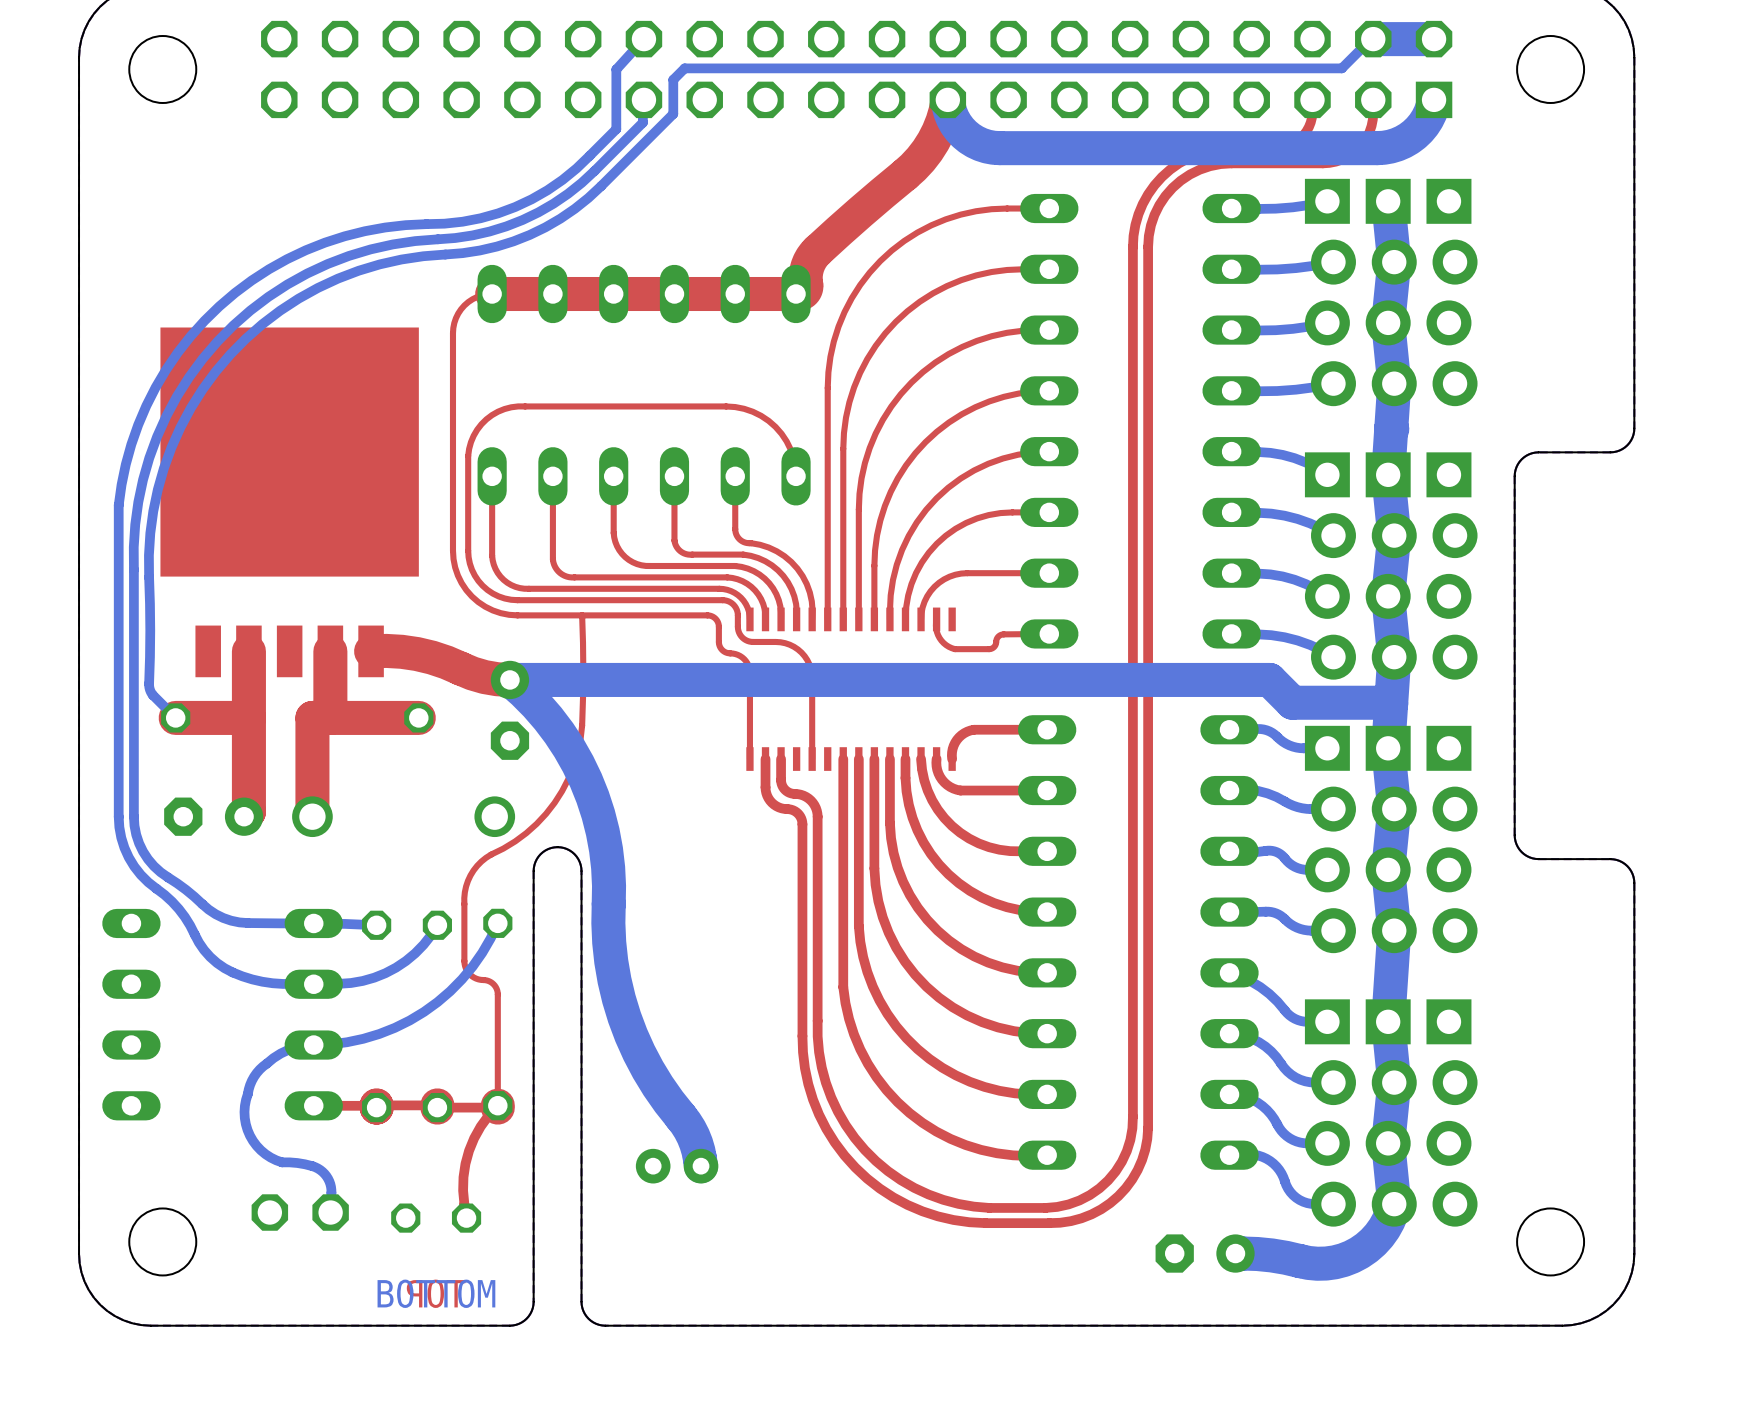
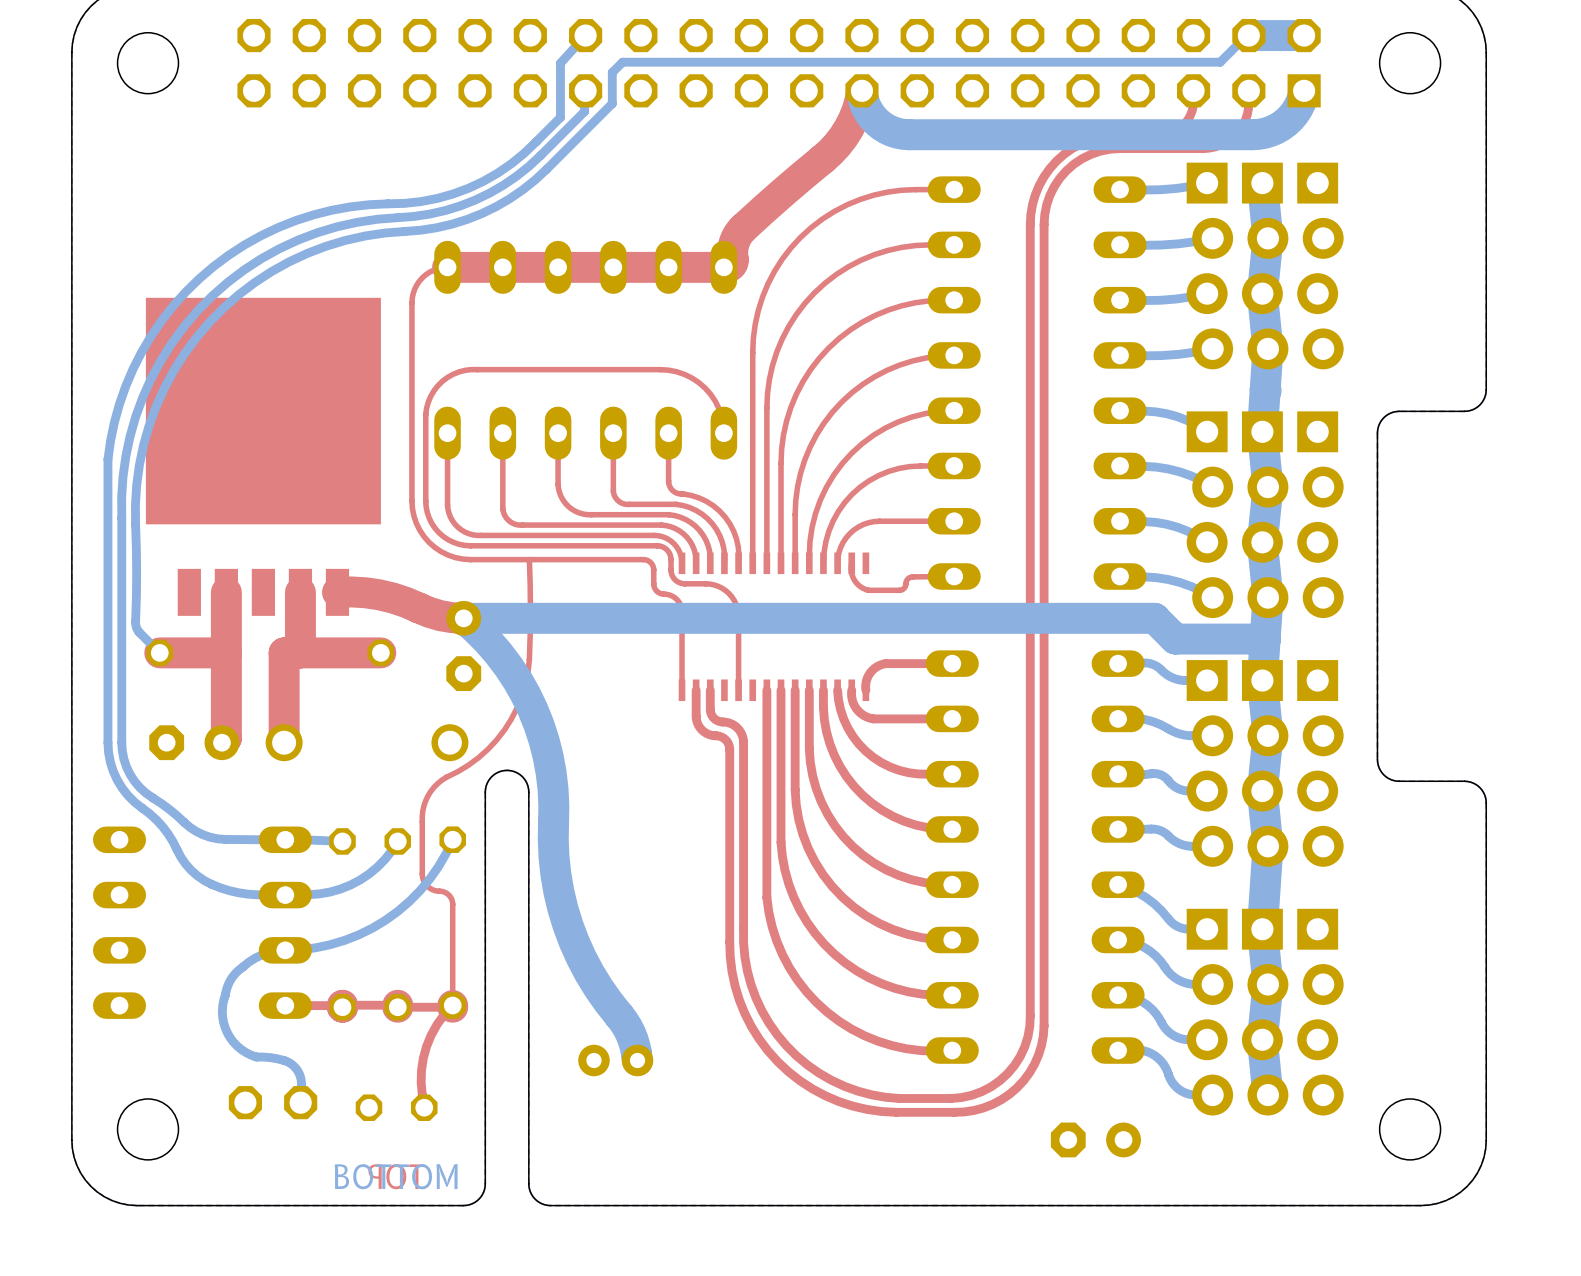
bottom track: (1394, 1204) (1388, 1220) (1379, 1235) (1366, 1247) (1343, 1260) (1317, 1263) (1271, 1255) (1235, 1253) -> none

